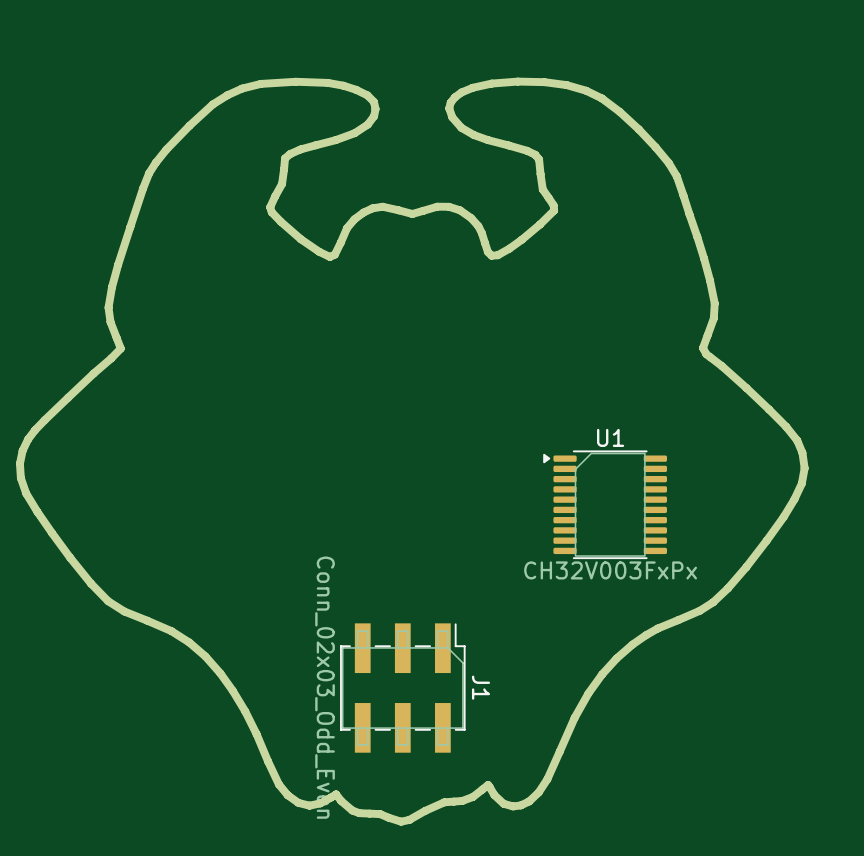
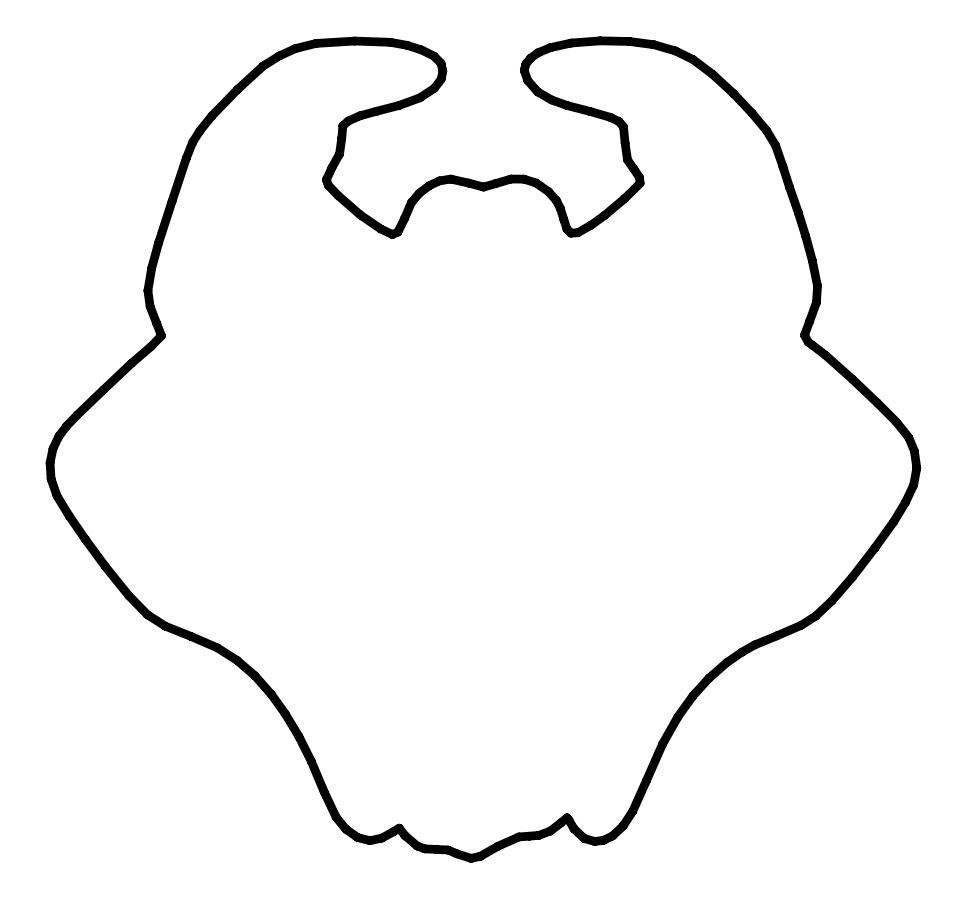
U1: CH32V003FxPx (605, 504) -> none
J1: Conn_02x03_Odd_Even (402, 688) -> none

